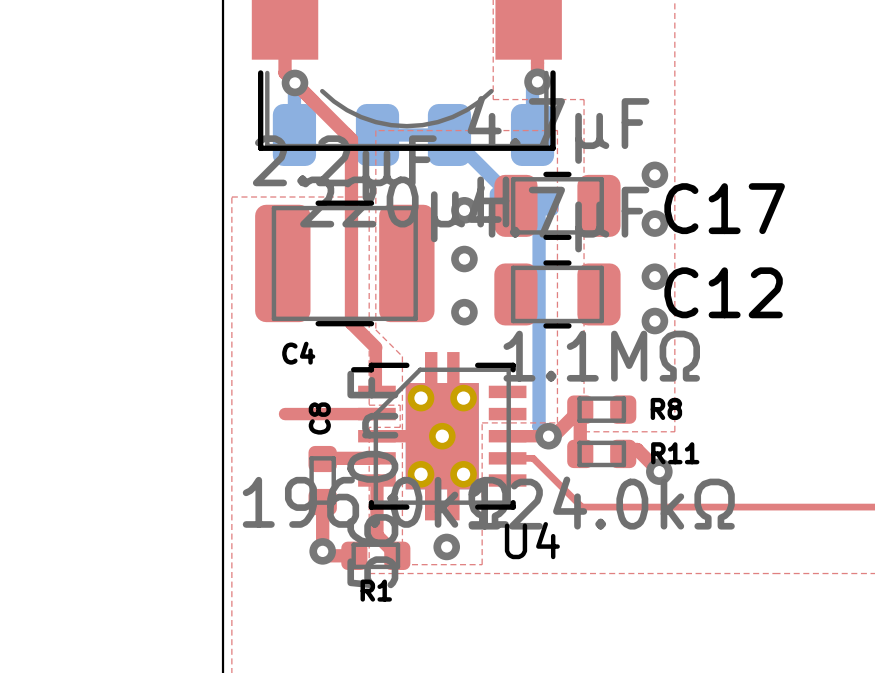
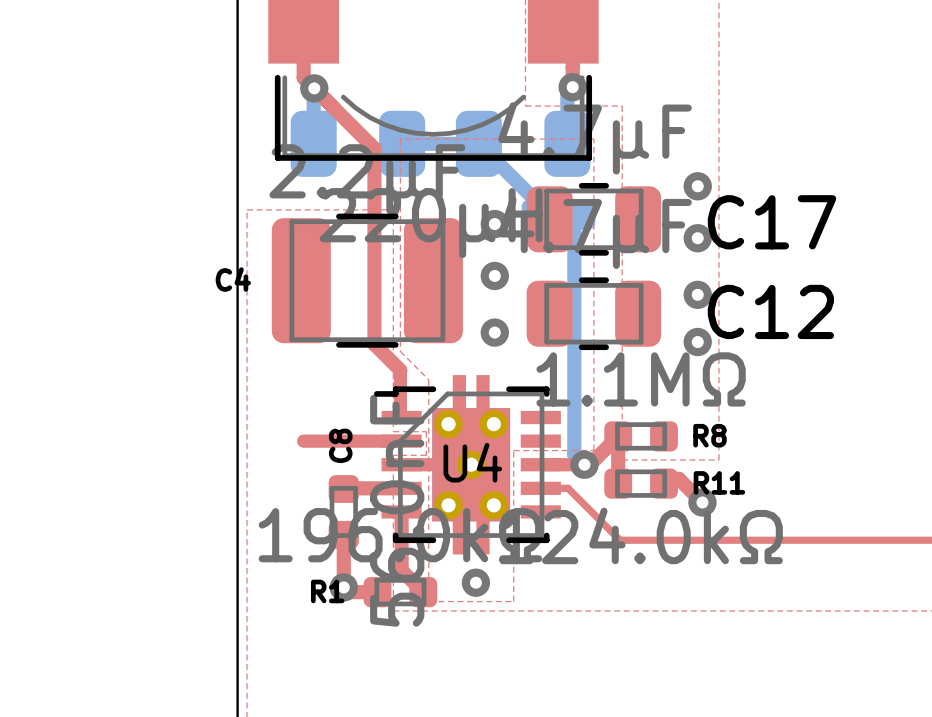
C4 name position: C4 (298, 353) -> C4 (233, 279)
U4 name position: U4 (532, 540) -> U4 (472, 462)
R1 name position: R1 (376, 590) -> R1 (327, 591)

